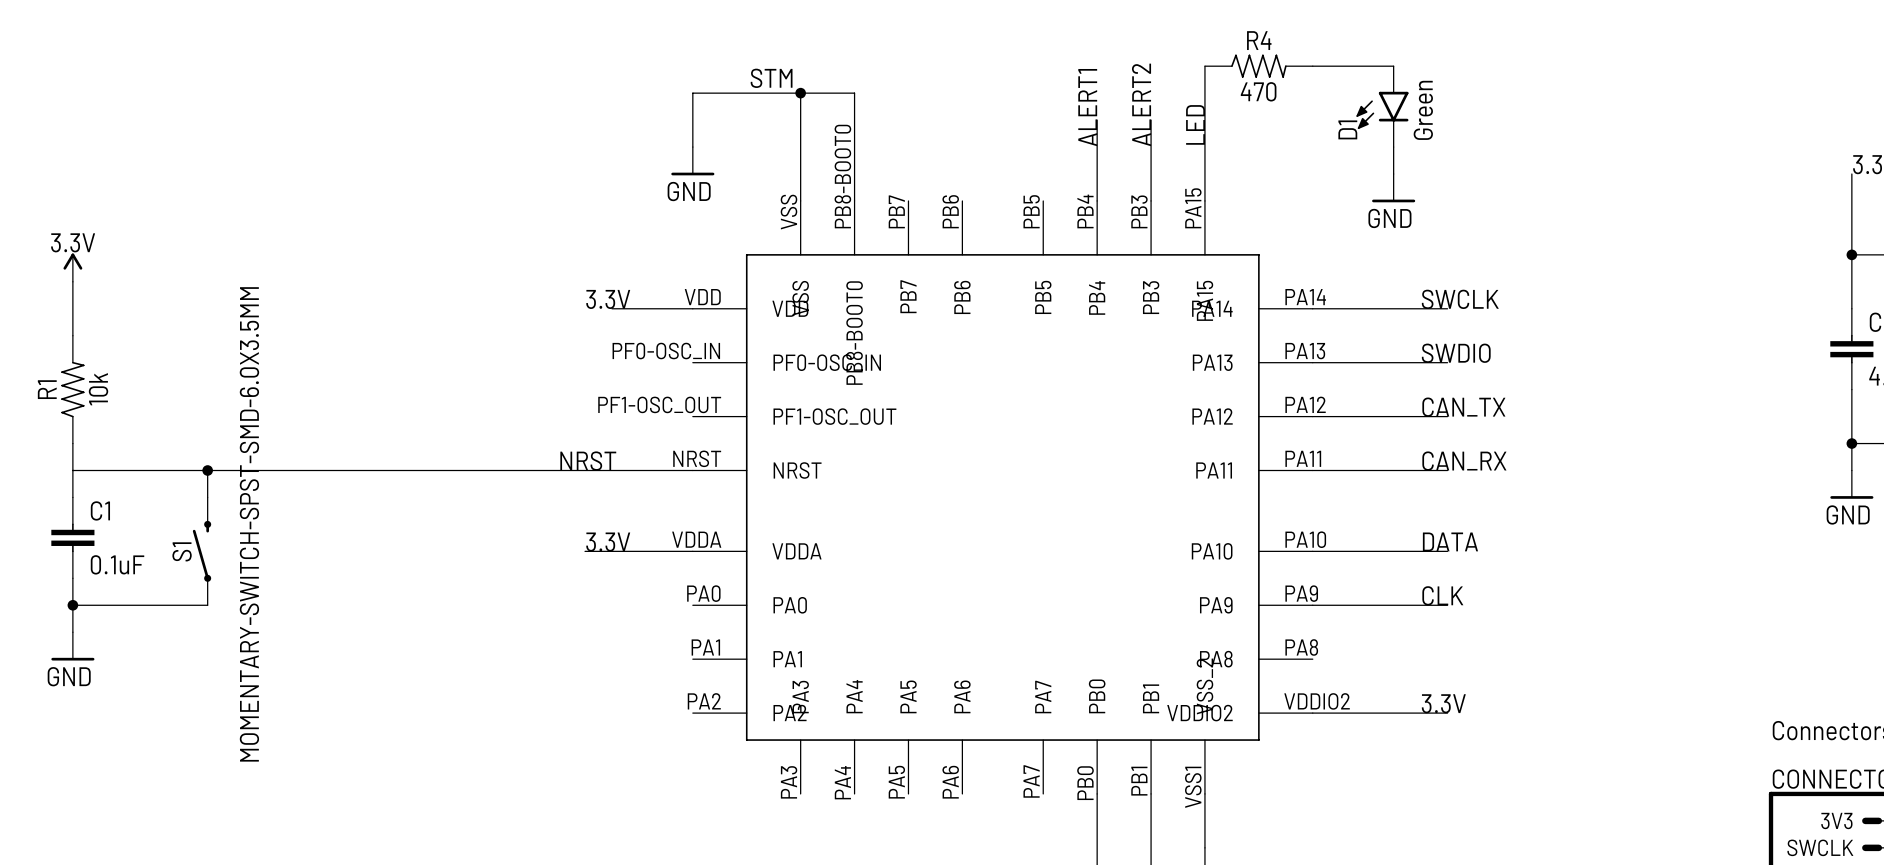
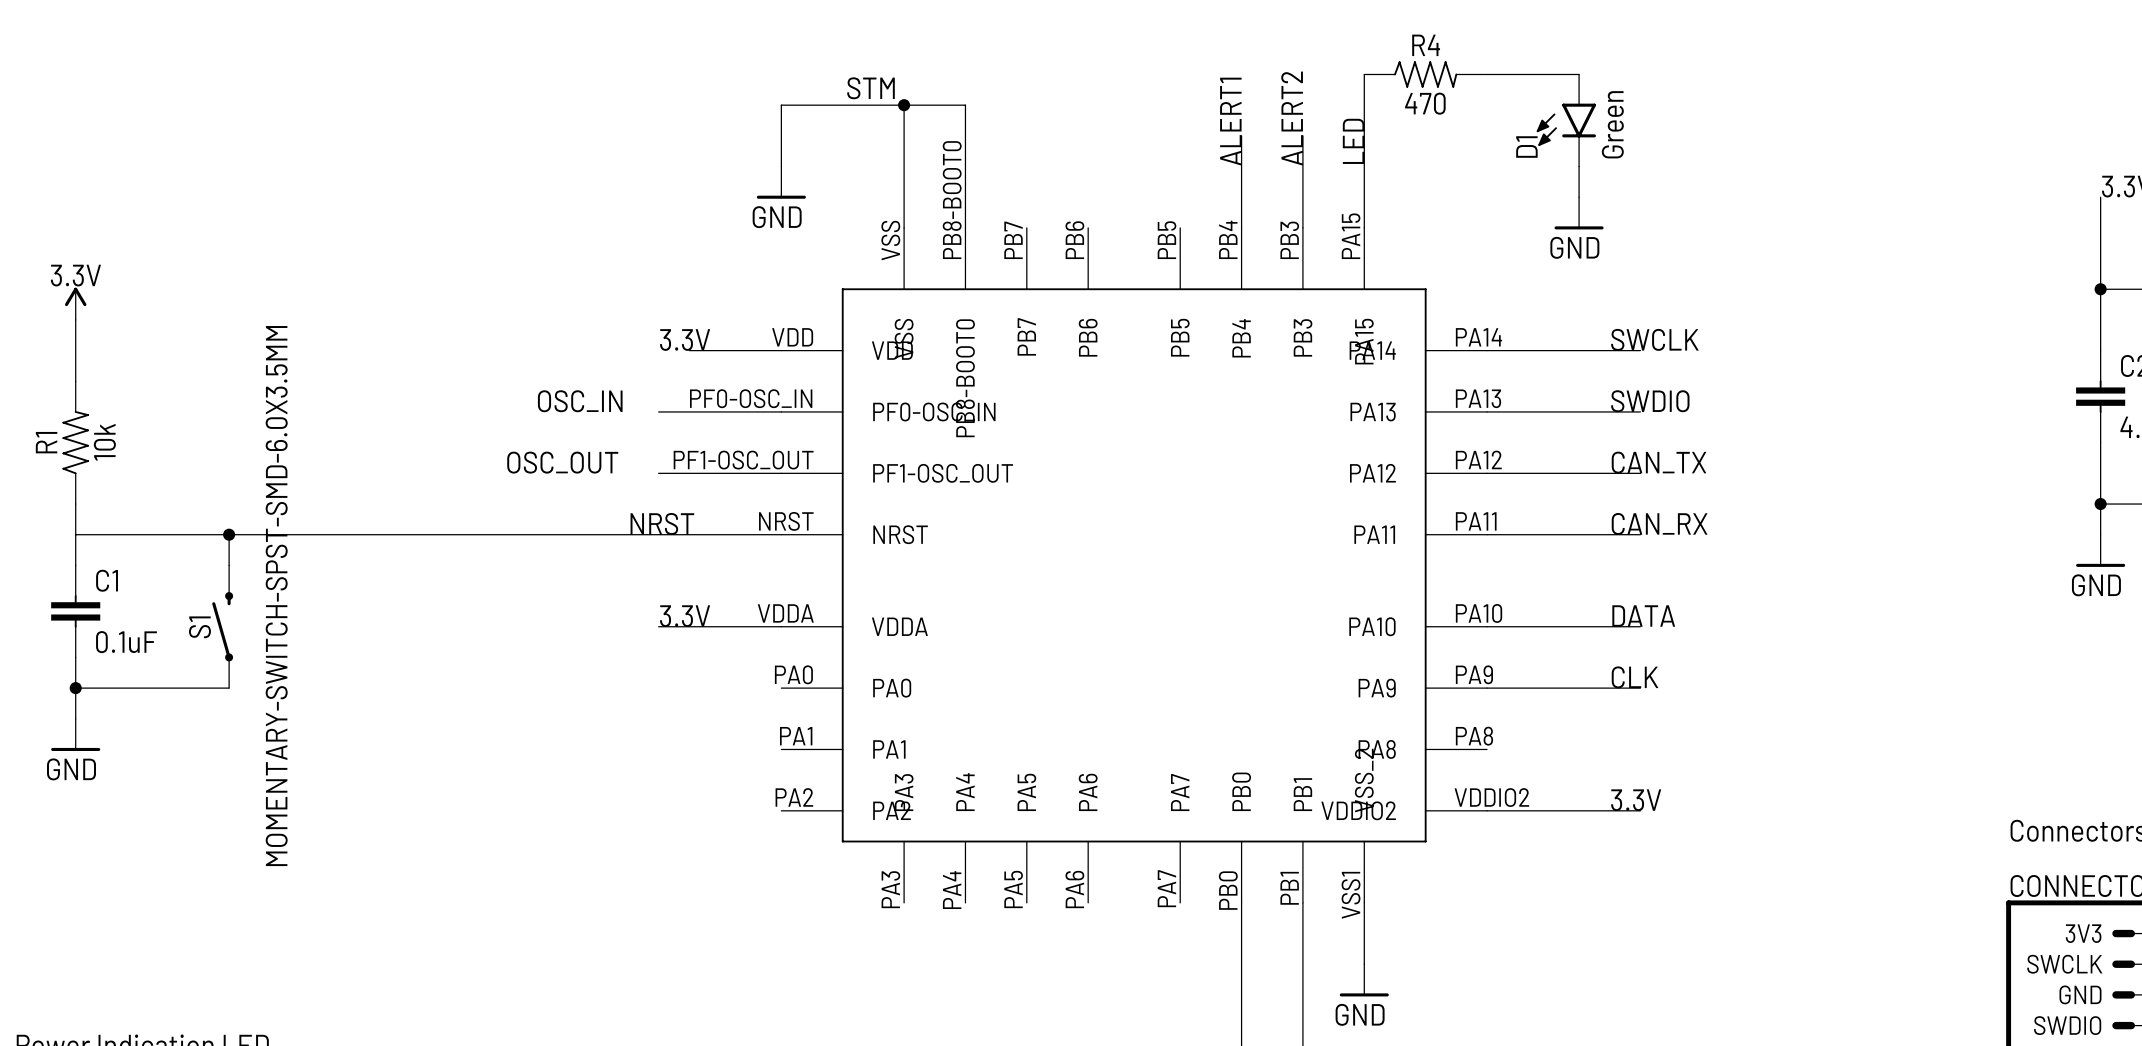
label: none -> OSC_IN (580, 401)
wire: none -> (658, 411) (781, 411)
label: none -> OSC_OUT (562, 462)
wire: none -> (658, 473) (781, 473)

